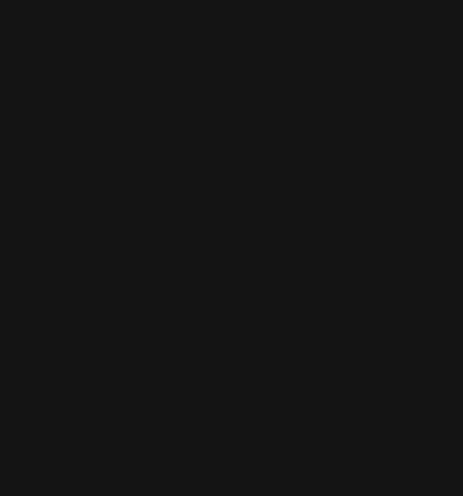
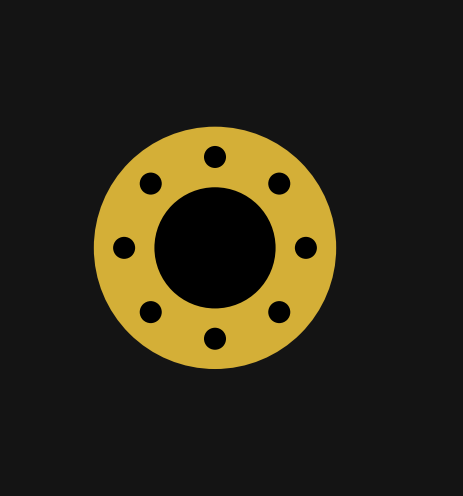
part: none -> (215, 247)

